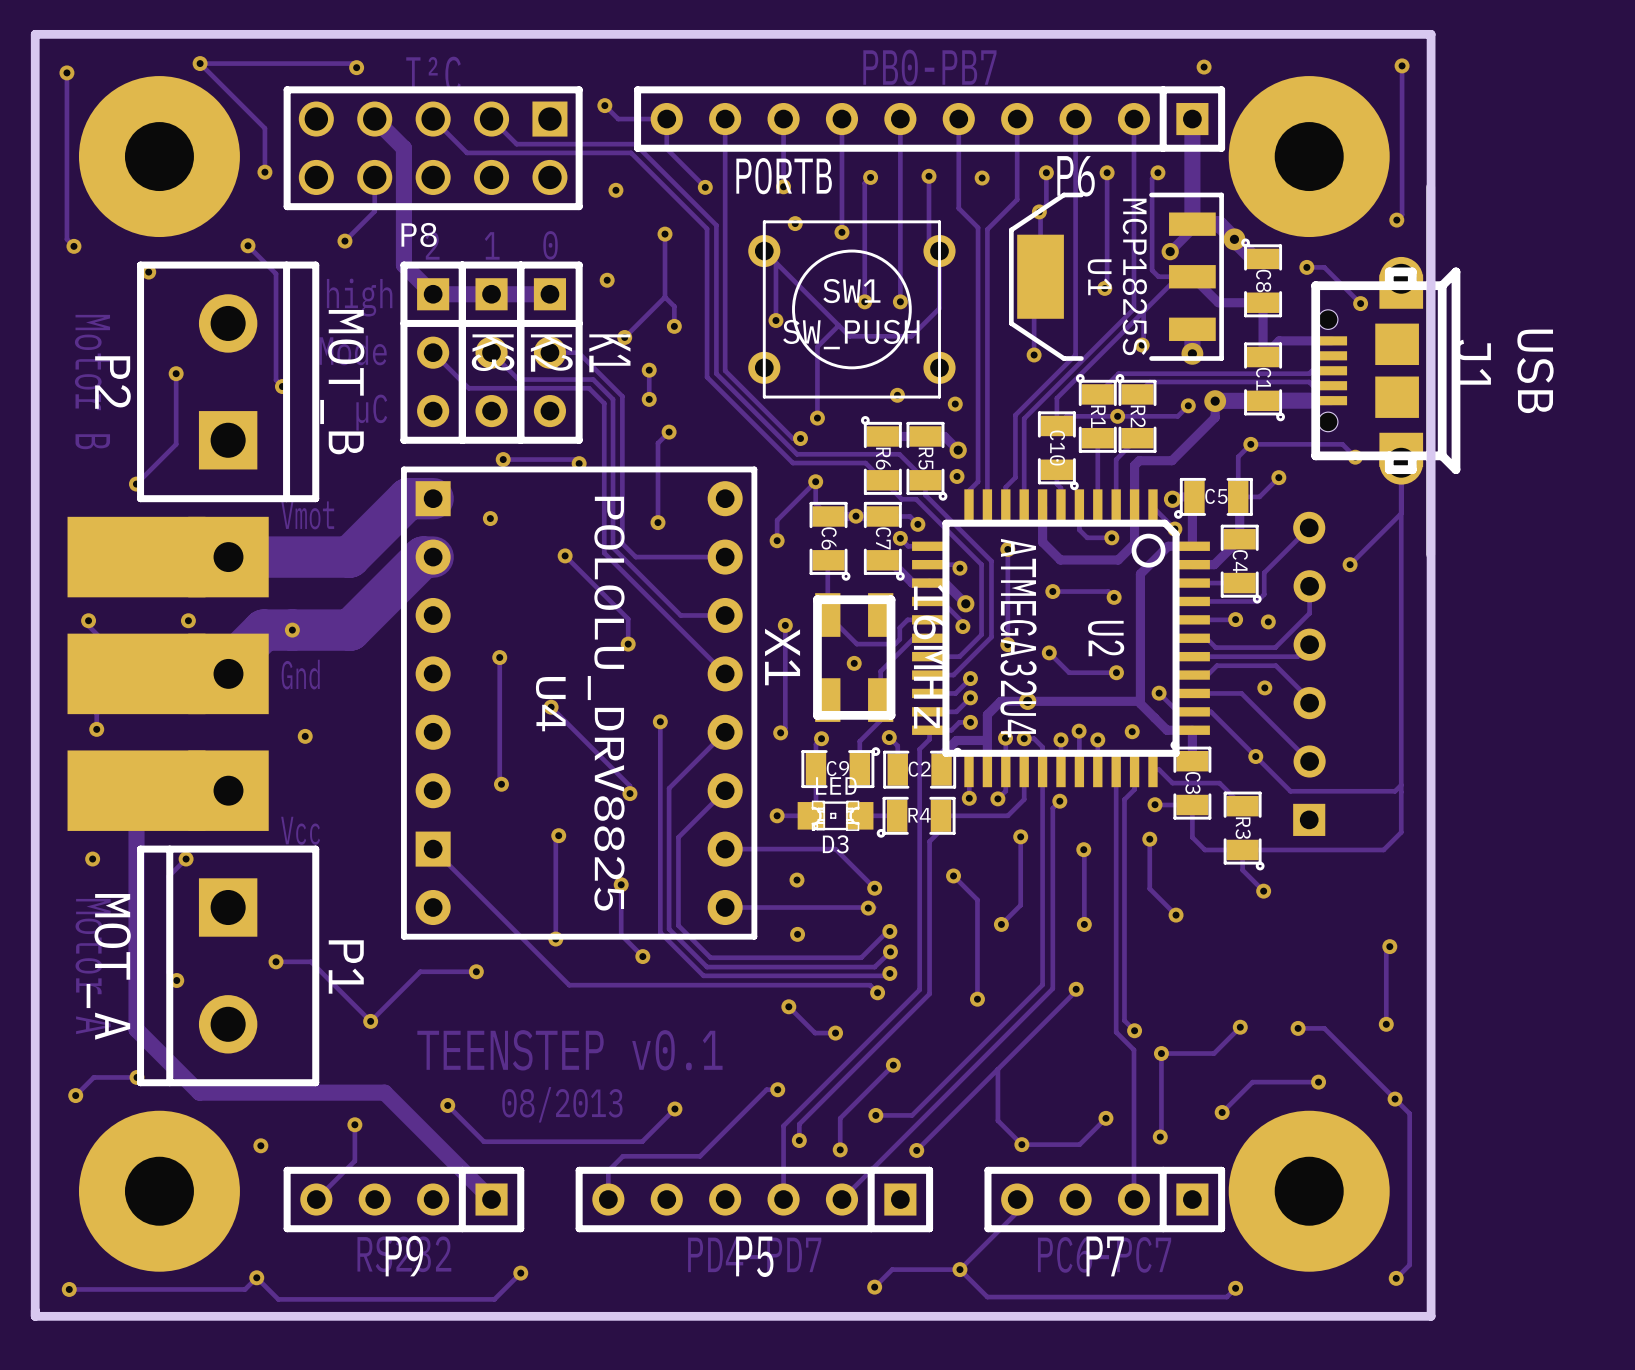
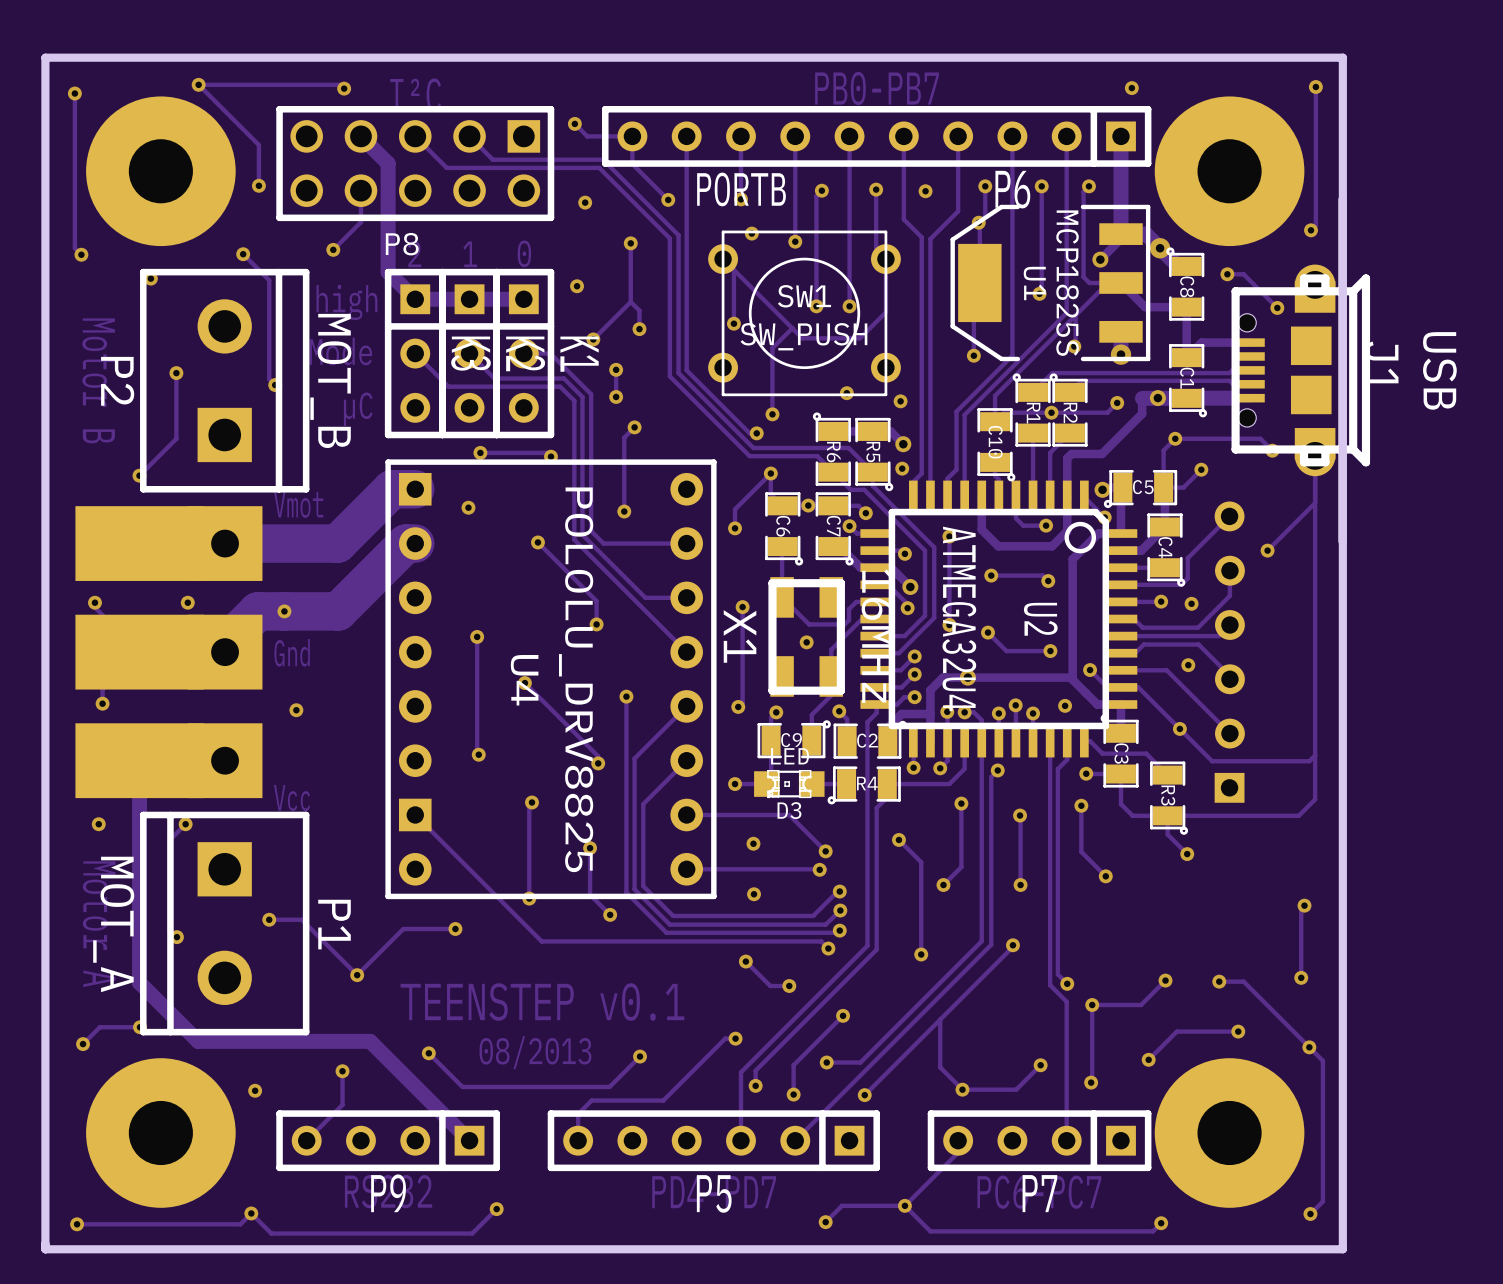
via position: (1215, 401) -> (1157, 398)

